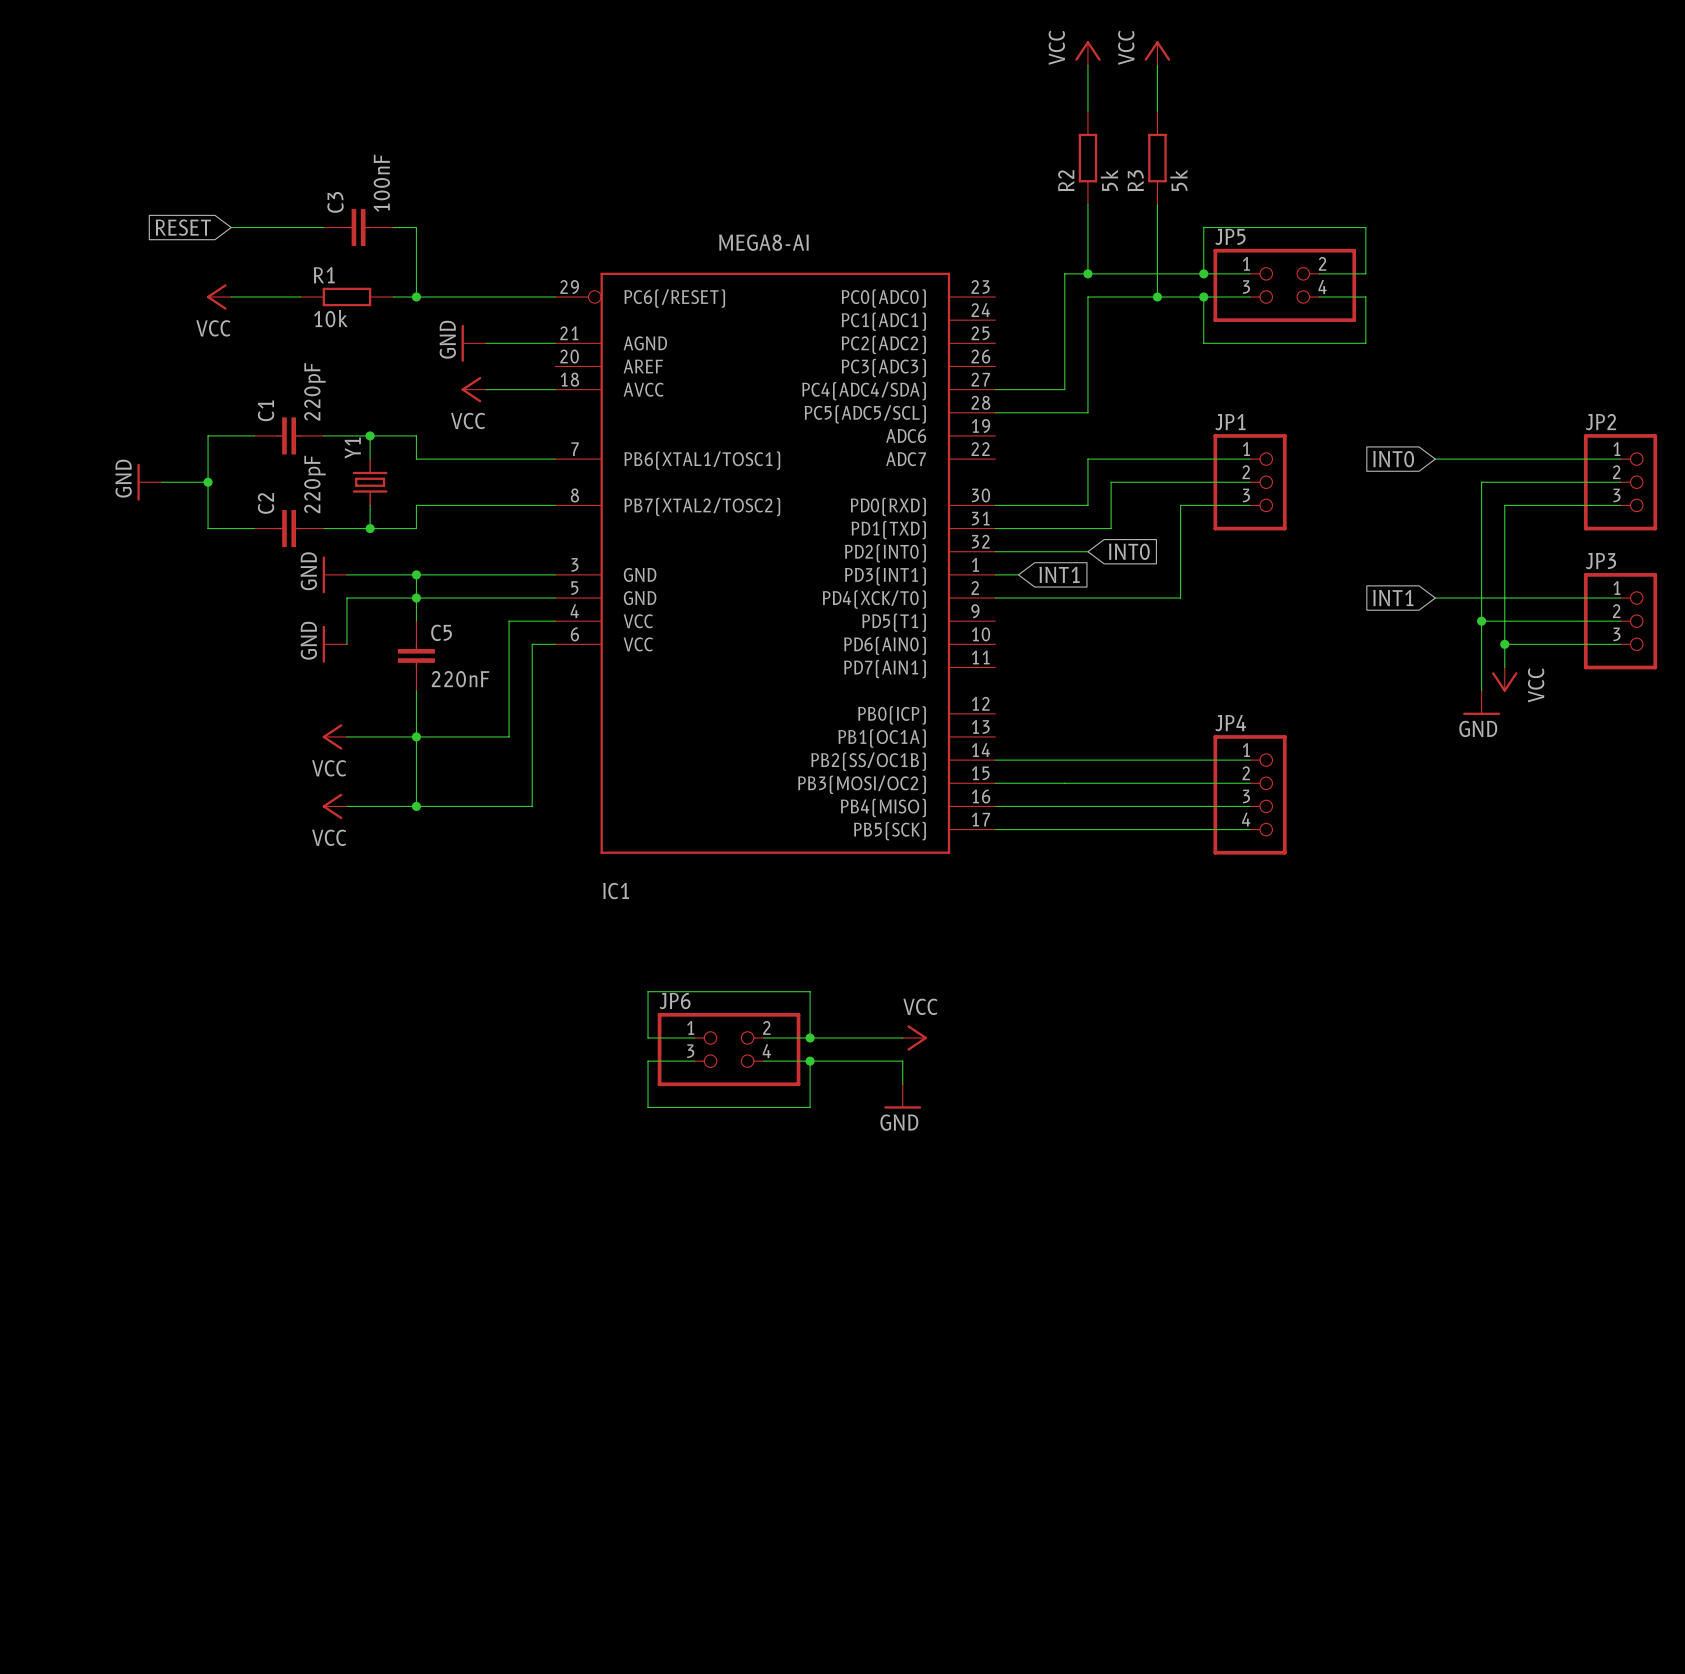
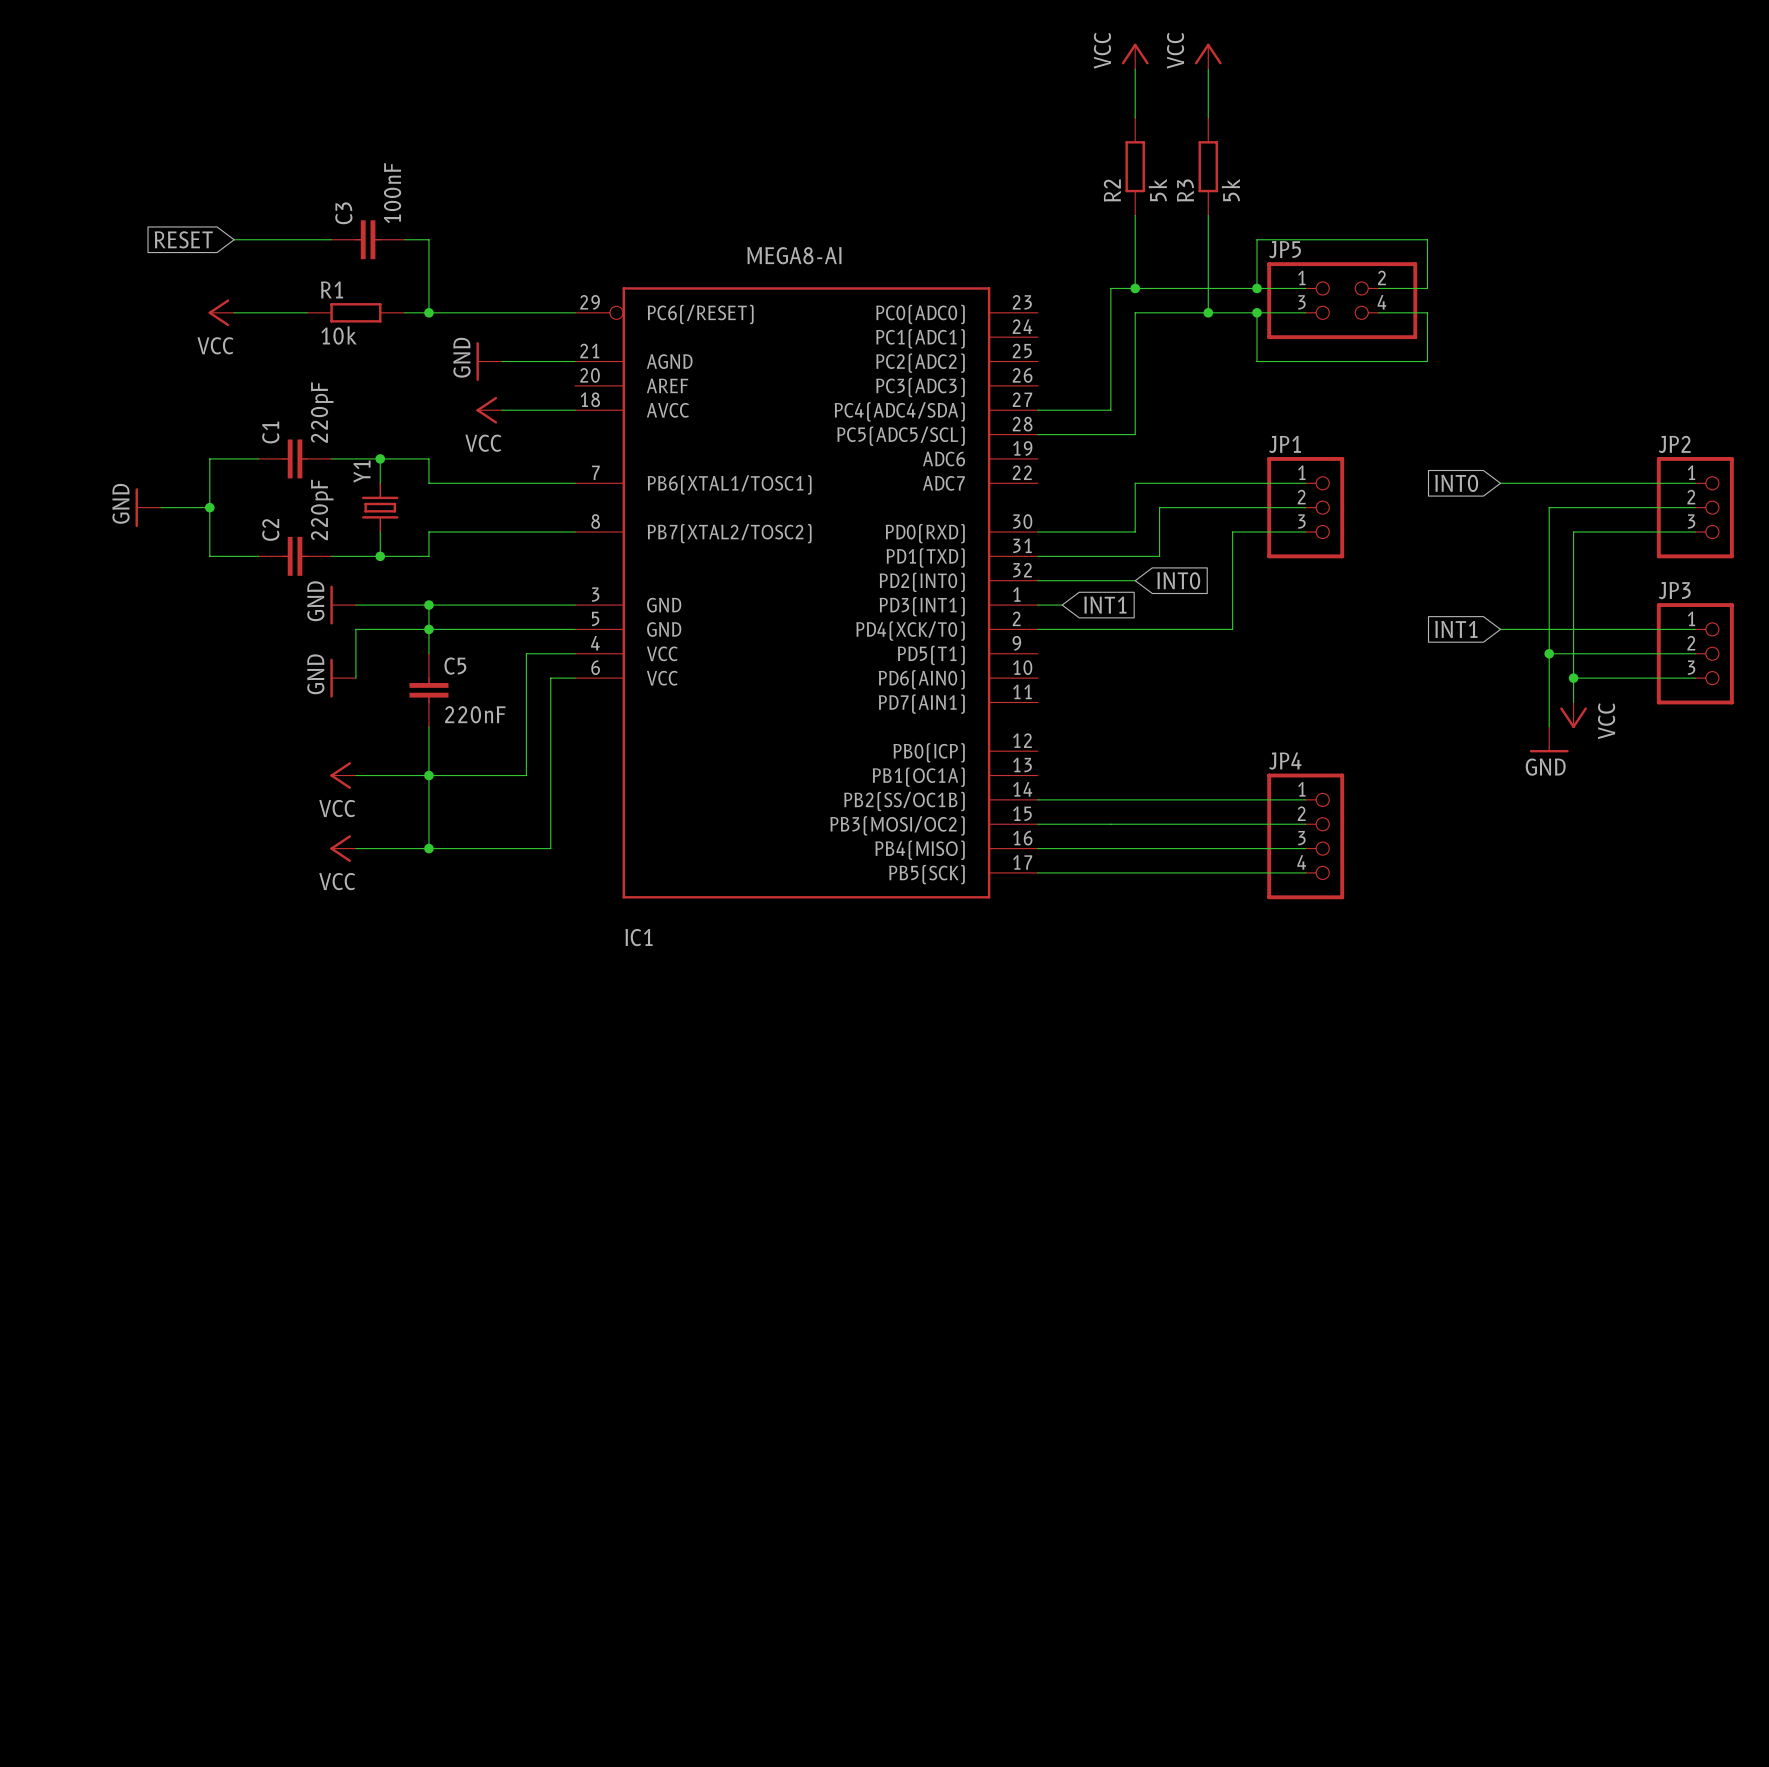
wire: (694, 1037) (648, 1037) (648, 991) (810, 991) (810, 1037) -> none
wire: (763, 1037) (902, 1037) -> none
junction: (810, 1037) -> none
power symbol: VCC (914, 1037) -> none
JP6: (729, 1049) -> none
wire: (694, 1061) (648, 1061) (648, 1107) (810, 1107) (810, 1061) -> none
wire: (763, 1061) (902, 1061) (902, 1084) -> none
junction: (810, 1061) -> none
power symbol: GND (902, 1096) -> none

